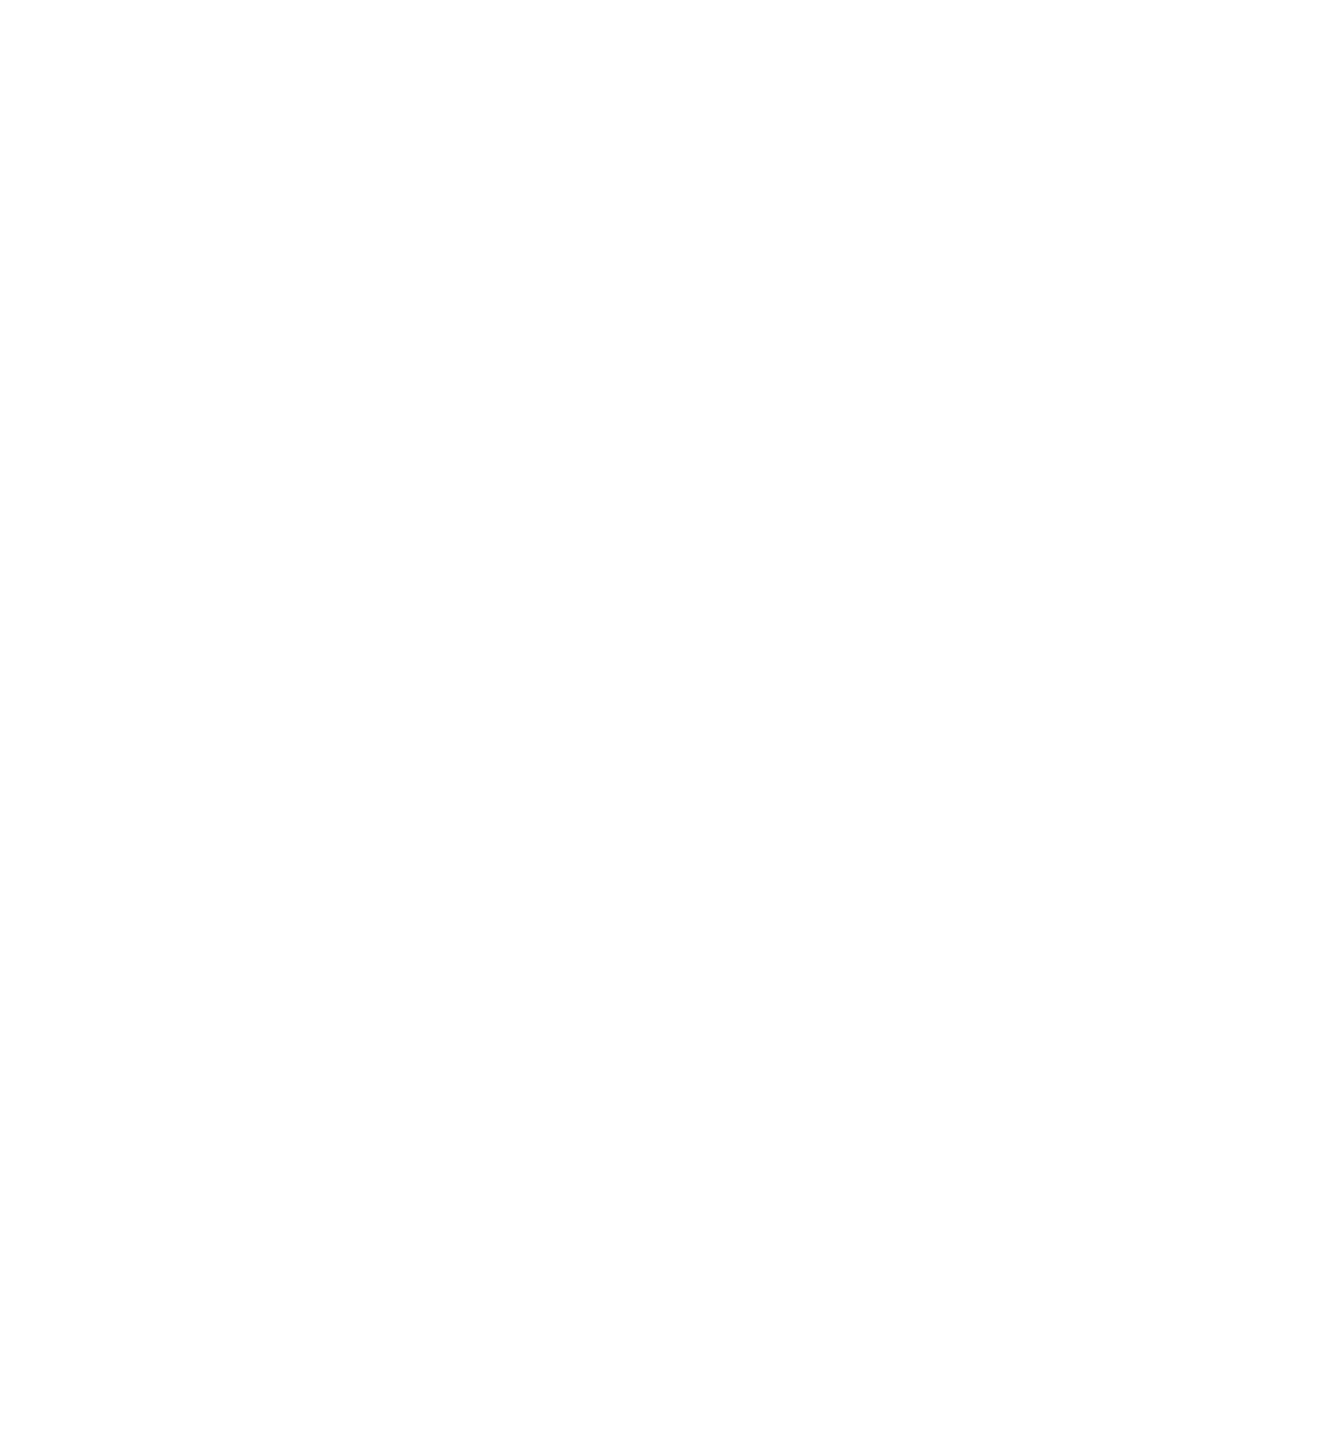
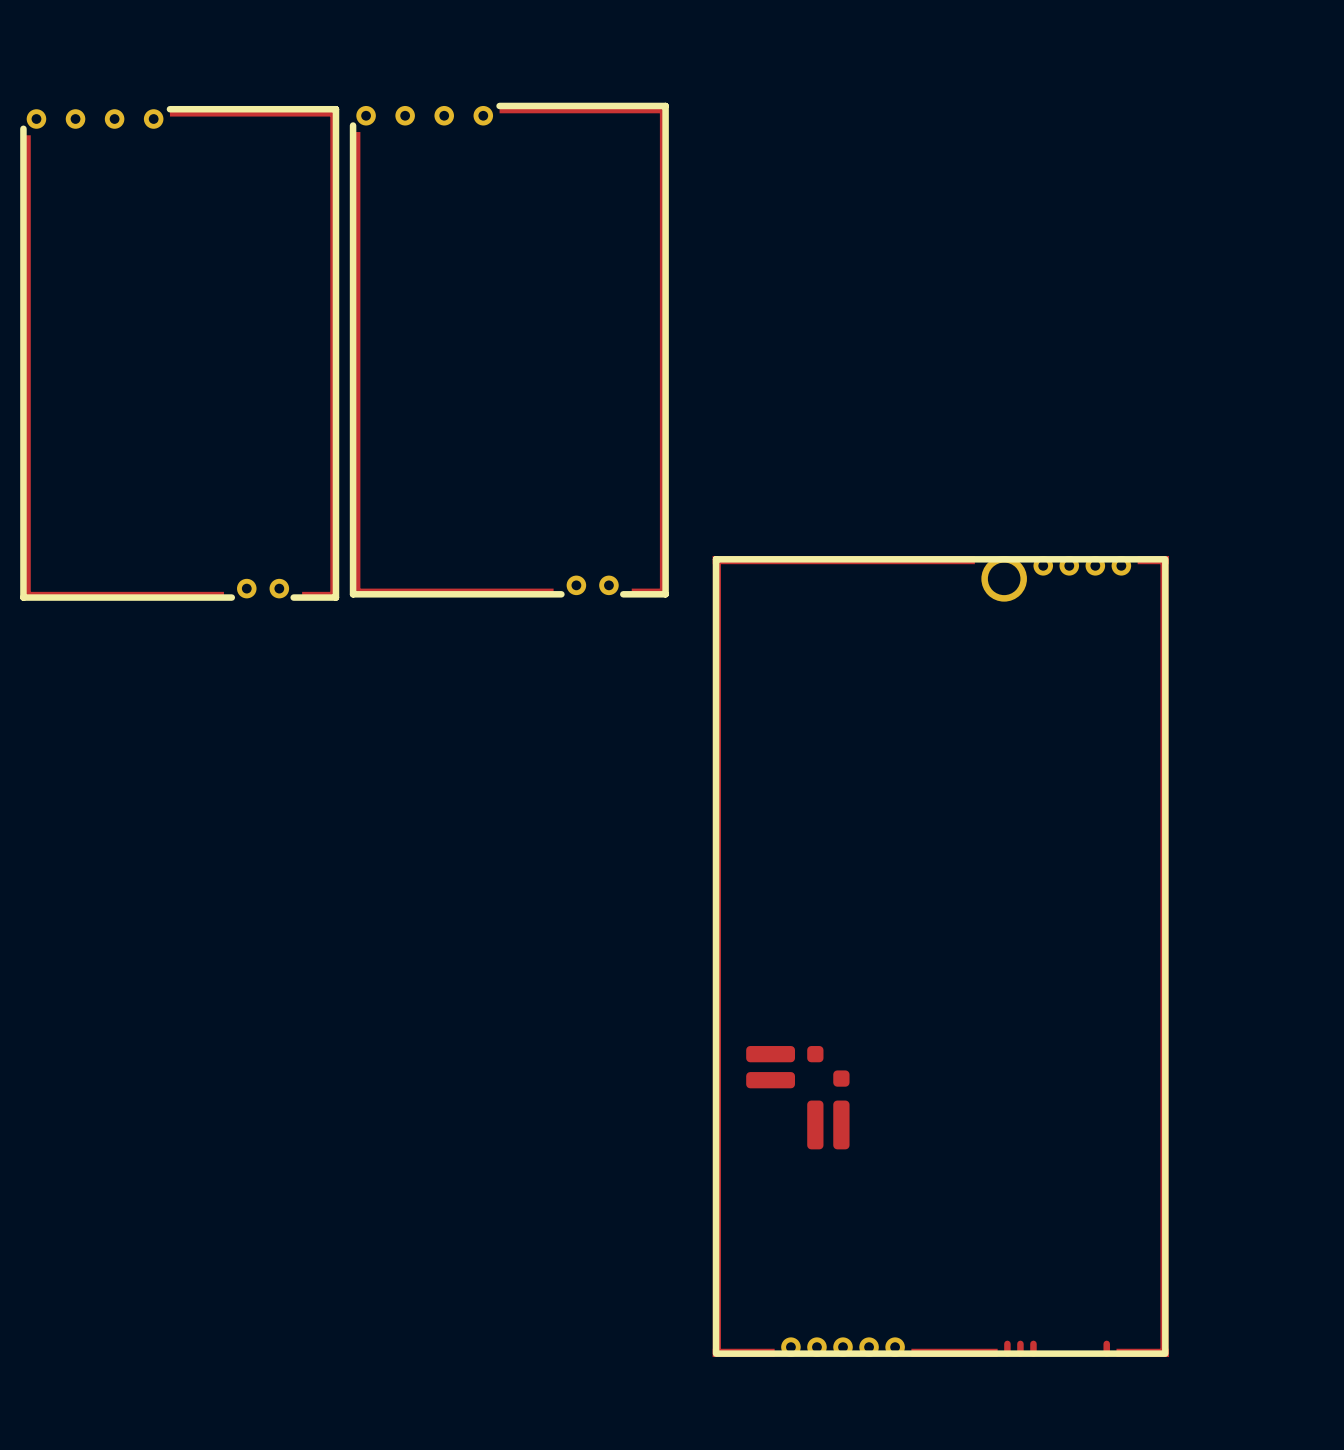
part: none -> (509, 350)
part: none -> (179, 353)
part: none -> (940, 956)

